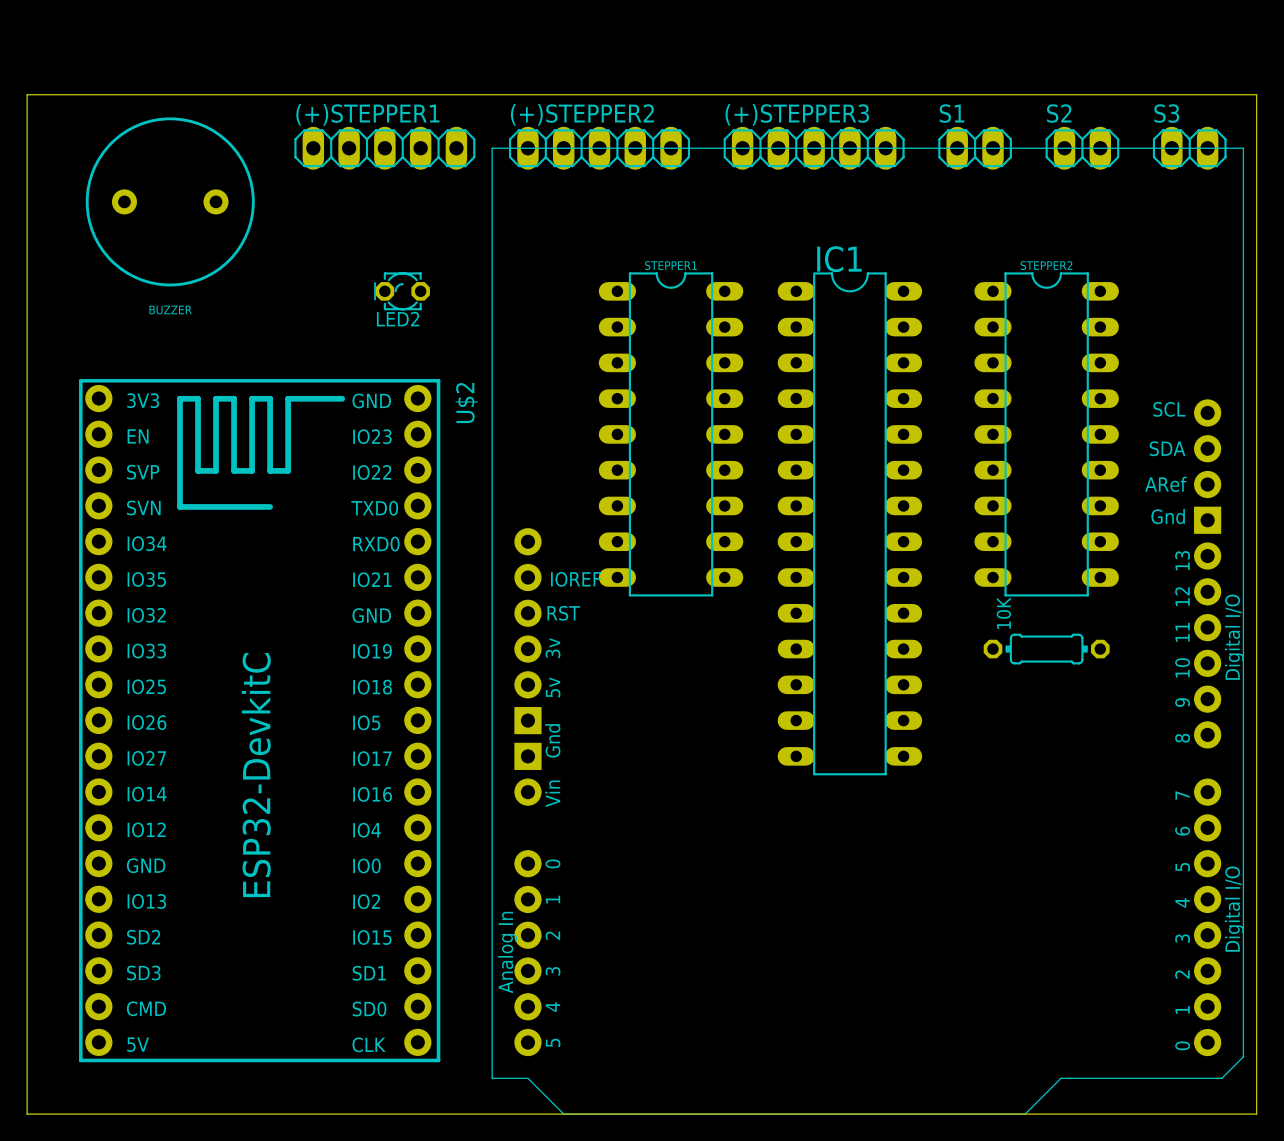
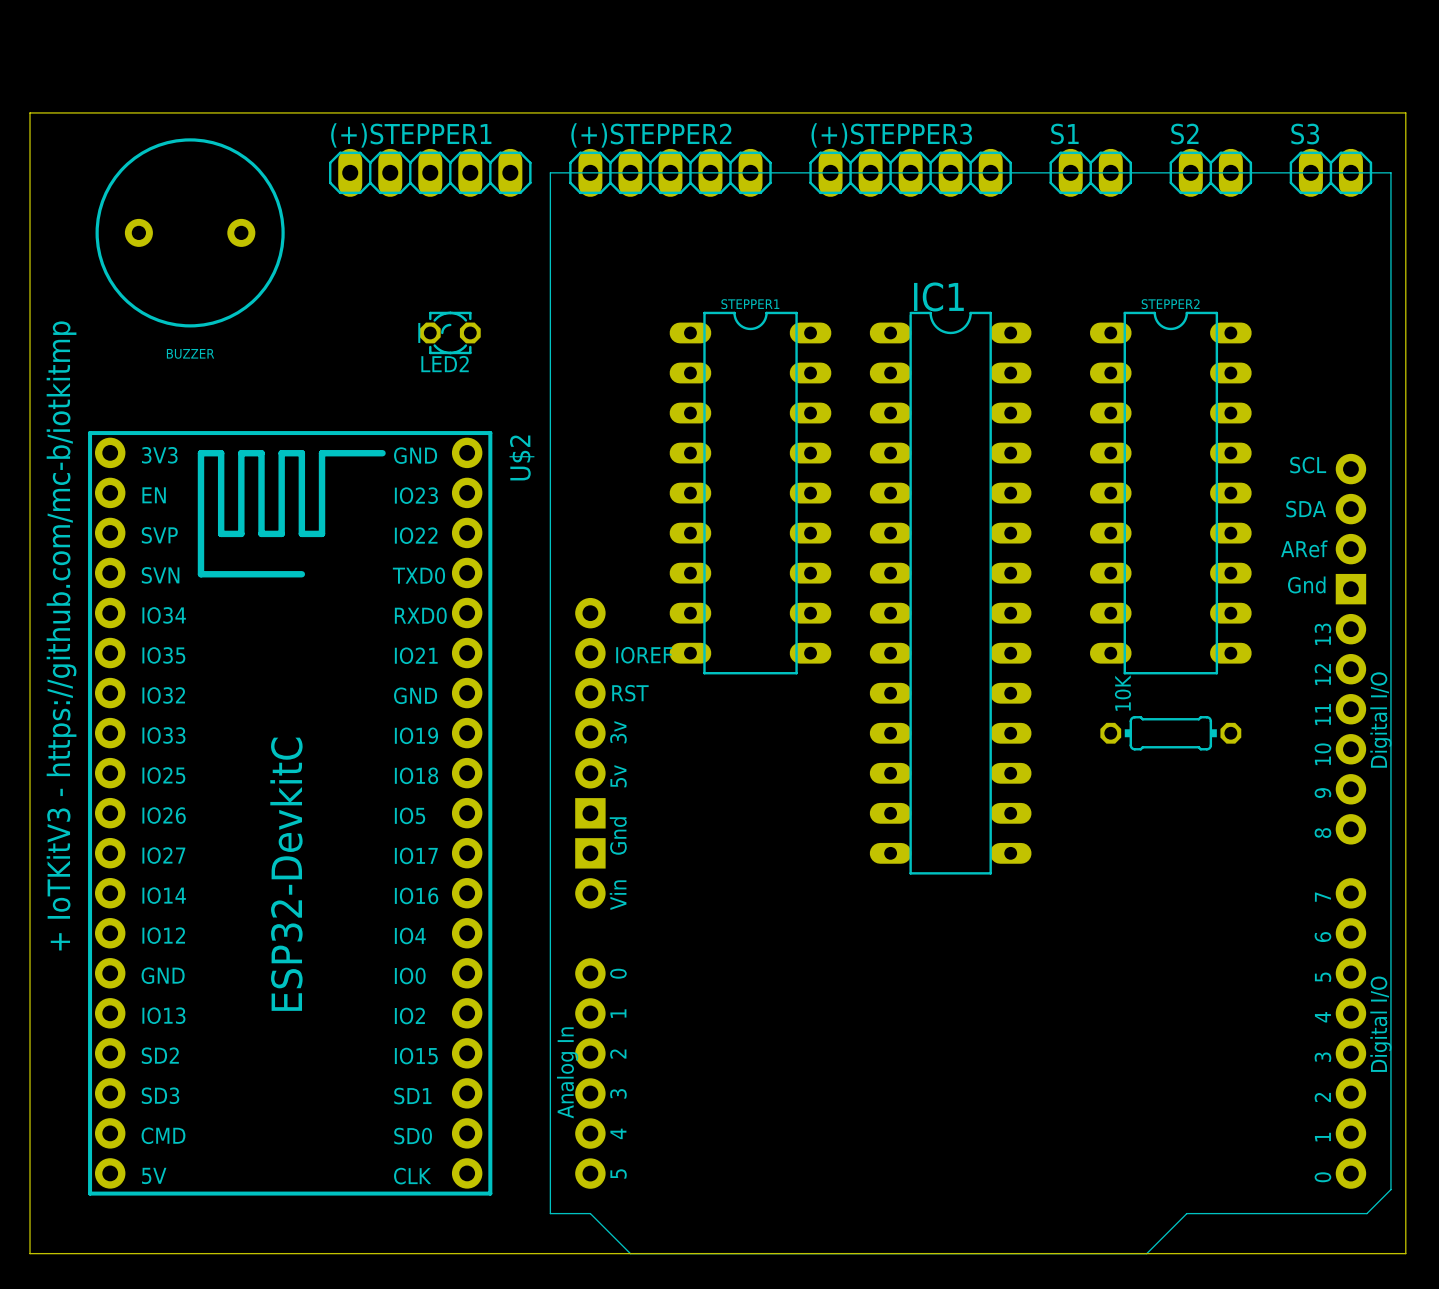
text: none -> + IoTKitV3 - https://github.com/mc-b/iotkitmp (61, 635)

